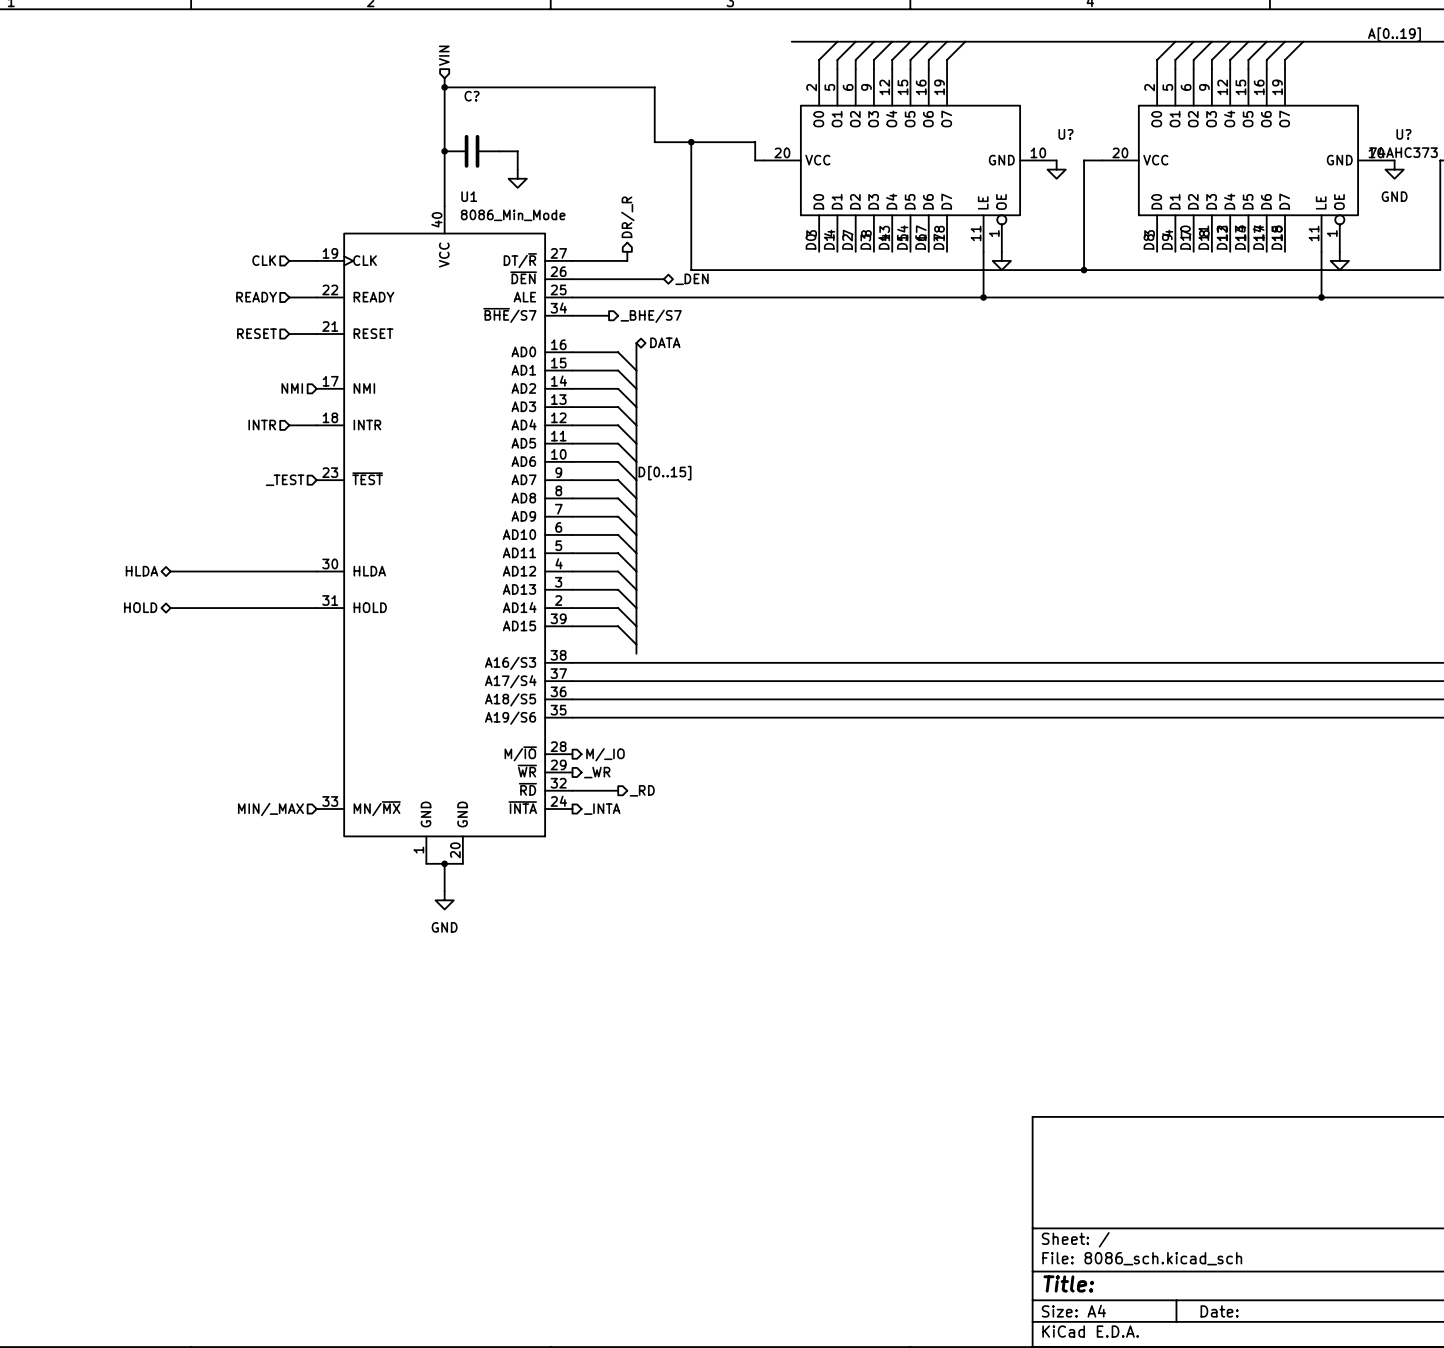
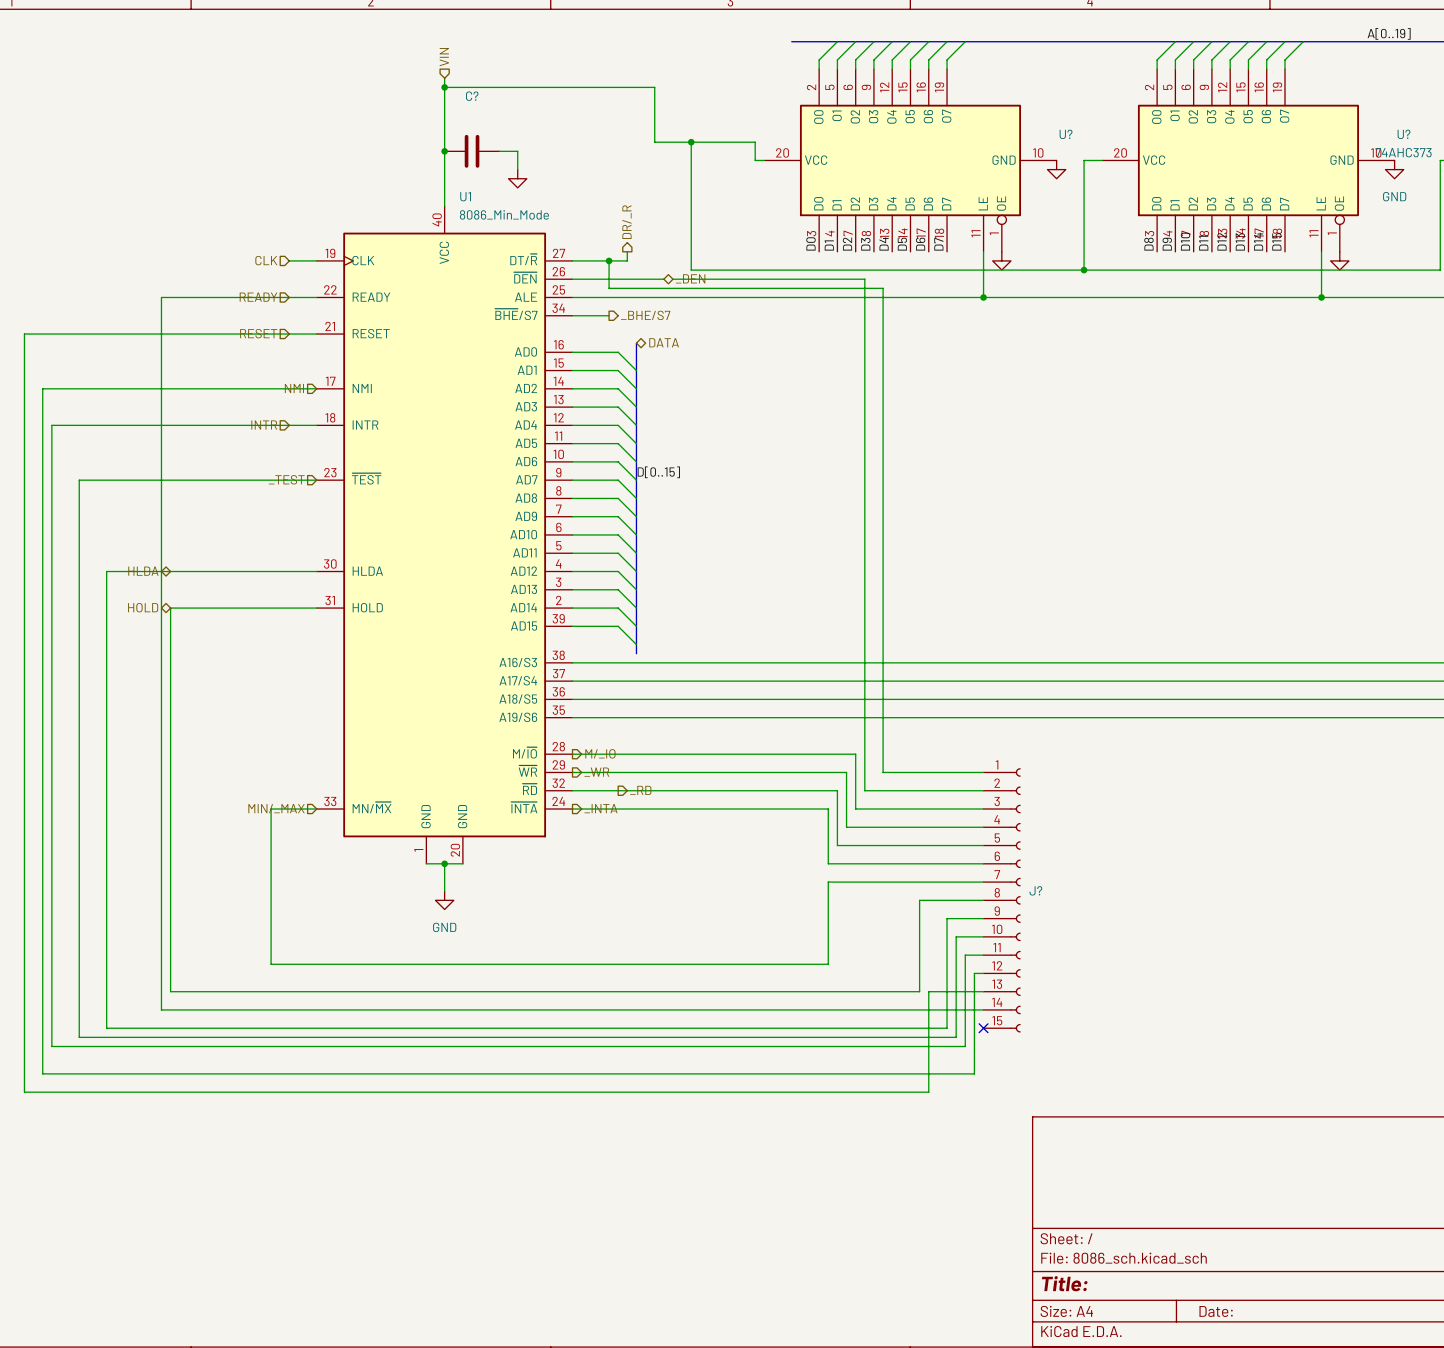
wire: none -> (609, 260) (609, 288) (883, 288) (883, 772) (983, 772)
junction: none -> (609, 260)
wire: none -> (672, 279) (864, 279) (864, 790) (983, 790)
wire: none -> (289, 297) (161, 297) (161, 1009) (983, 1009)
wire: none -> (289, 334) (24, 334) (24, 1092) (928, 1092) (928, 991) (983, 991)
wire: none -> (316, 388) (42, 388) (42, 1073) (974, 1073) (974, 973) (983, 973)
wire: none -> (289, 425) (51, 425) (51, 1046) (965, 1046) (965, 955) (983, 955)
wire: none -> (316, 480) (79, 480) (79, 1037) (956, 1037) (956, 936) (983, 936)
wire: none -> (170, 571) (106, 571) (106, 1028) (947, 1028) (947, 918) (983, 918)
wire: none -> (170, 608) (170, 991) (919, 991) (919, 900) (983, 900)
wire: none -> (572, 754) (855, 754) (855, 809) (983, 809)
wire: none -> (572, 772) (846, 772) (846, 827) (983, 827)
wire: none -> (618, 790) (837, 790) (837, 845) (983, 845)
wire: none -> (316, 809) (271, 809) (271, 964) (828, 964) (828, 882) (983, 882)
wire: none -> (572, 809) (828, 809) (828, 863) (983, 863)
J?: none -> (1002, 900)
no-connect mark: none -> (983, 1028)

